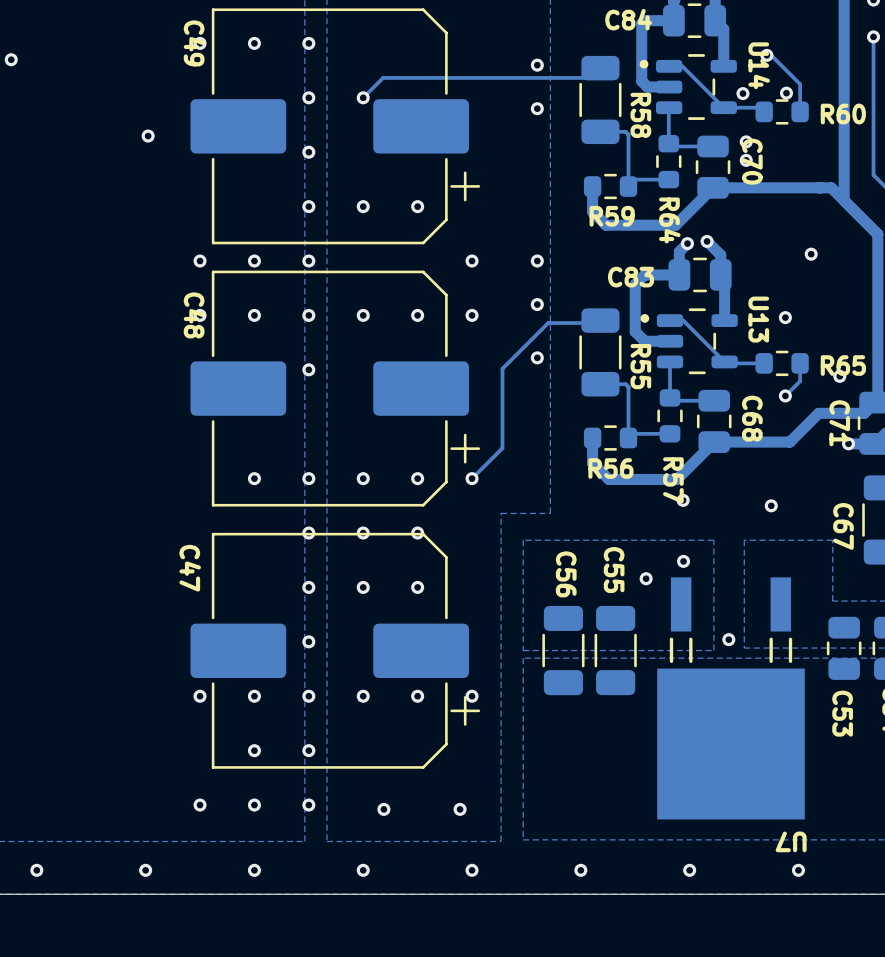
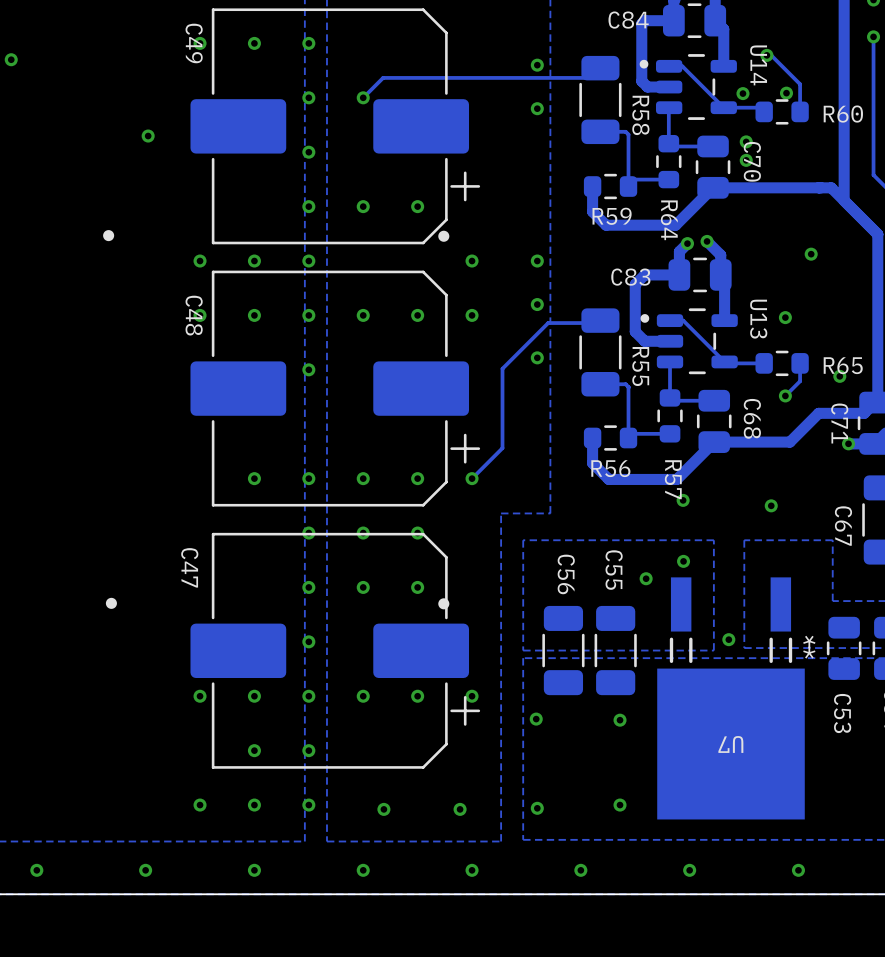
part: none -> (108, 235)
part: none -> (443, 236)
part: none -> (111, 603)
part: none -> (443, 603)
U7 text: none -> * (809, 641)
U7 text: none -> * (809, 652)
via: none -> (536, 719)
via: none -> (620, 720)
via: none -> (620, 805)
via: none -> (537, 808)
U7 name position: U7 (791, 841) -> U7 (730, 744)

